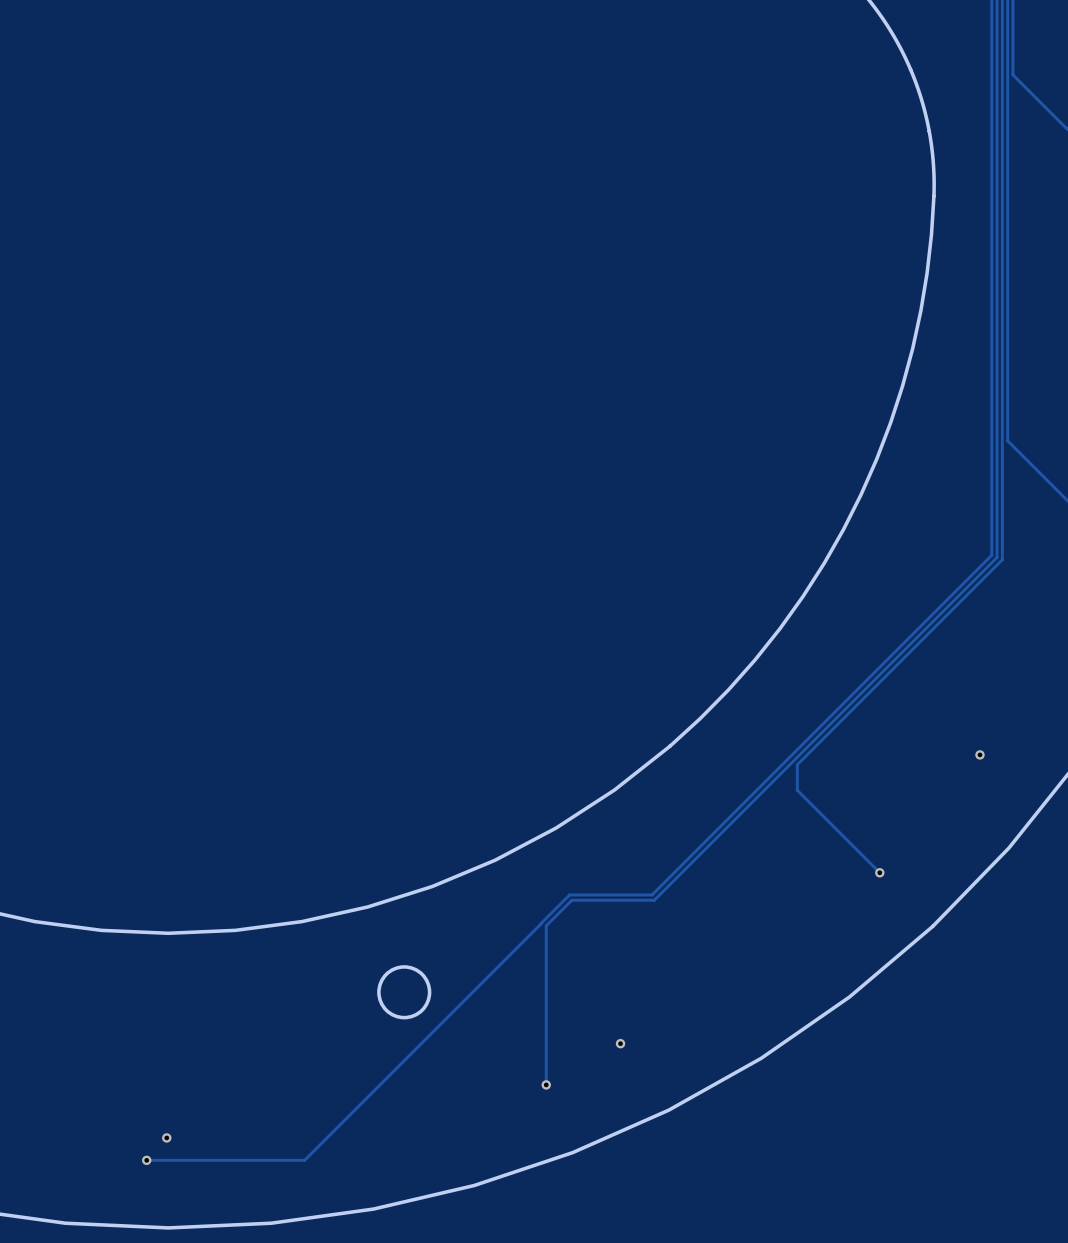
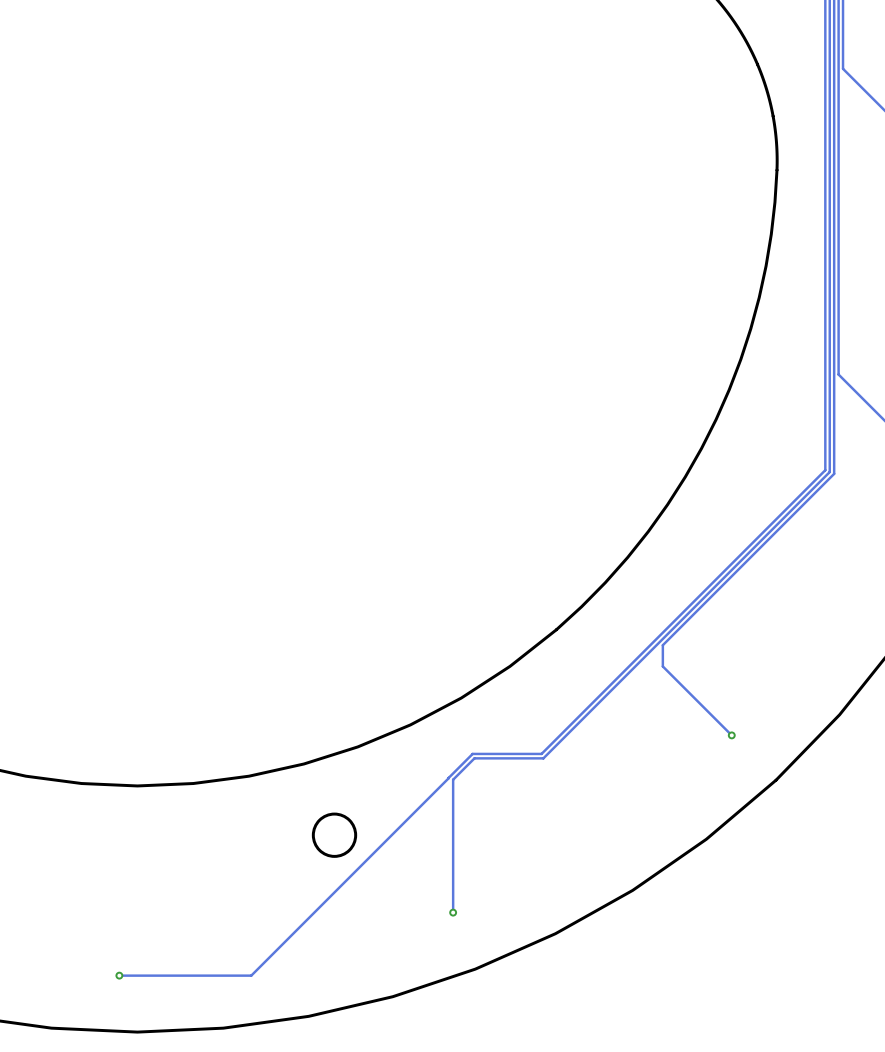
via: (979, 754) -> none
via: (620, 1043) -> none
via: (166, 1137) -> none

